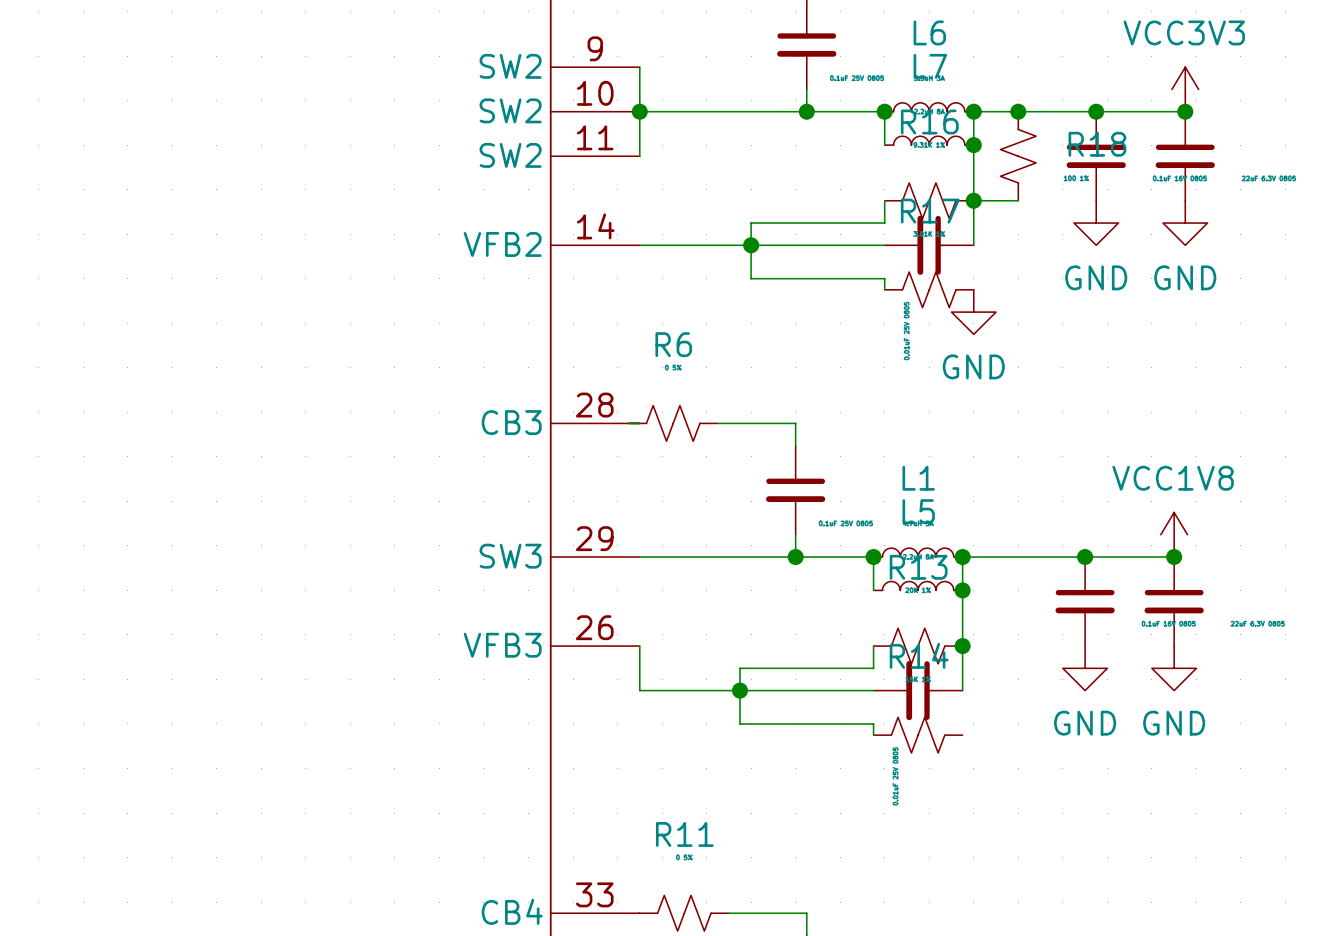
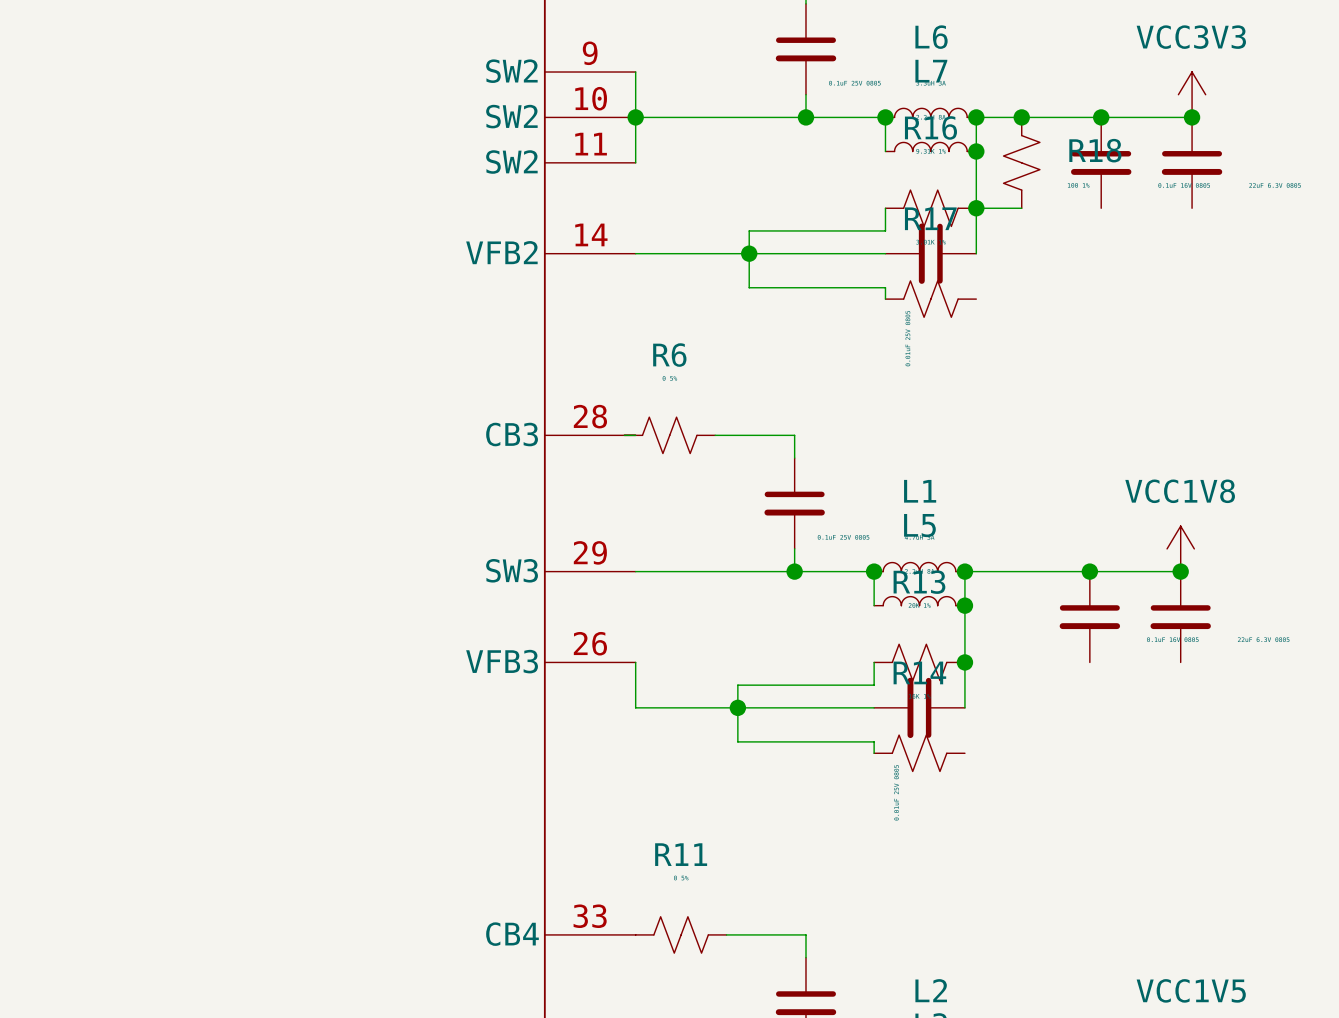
power symbol: GND (1096, 223) -> none
power symbol: GND (1185, 223) -> none
power symbol: GND (973, 312) -> none
power symbol: GND (1085, 668) -> none
power symbol: GND (1174, 668) -> none

